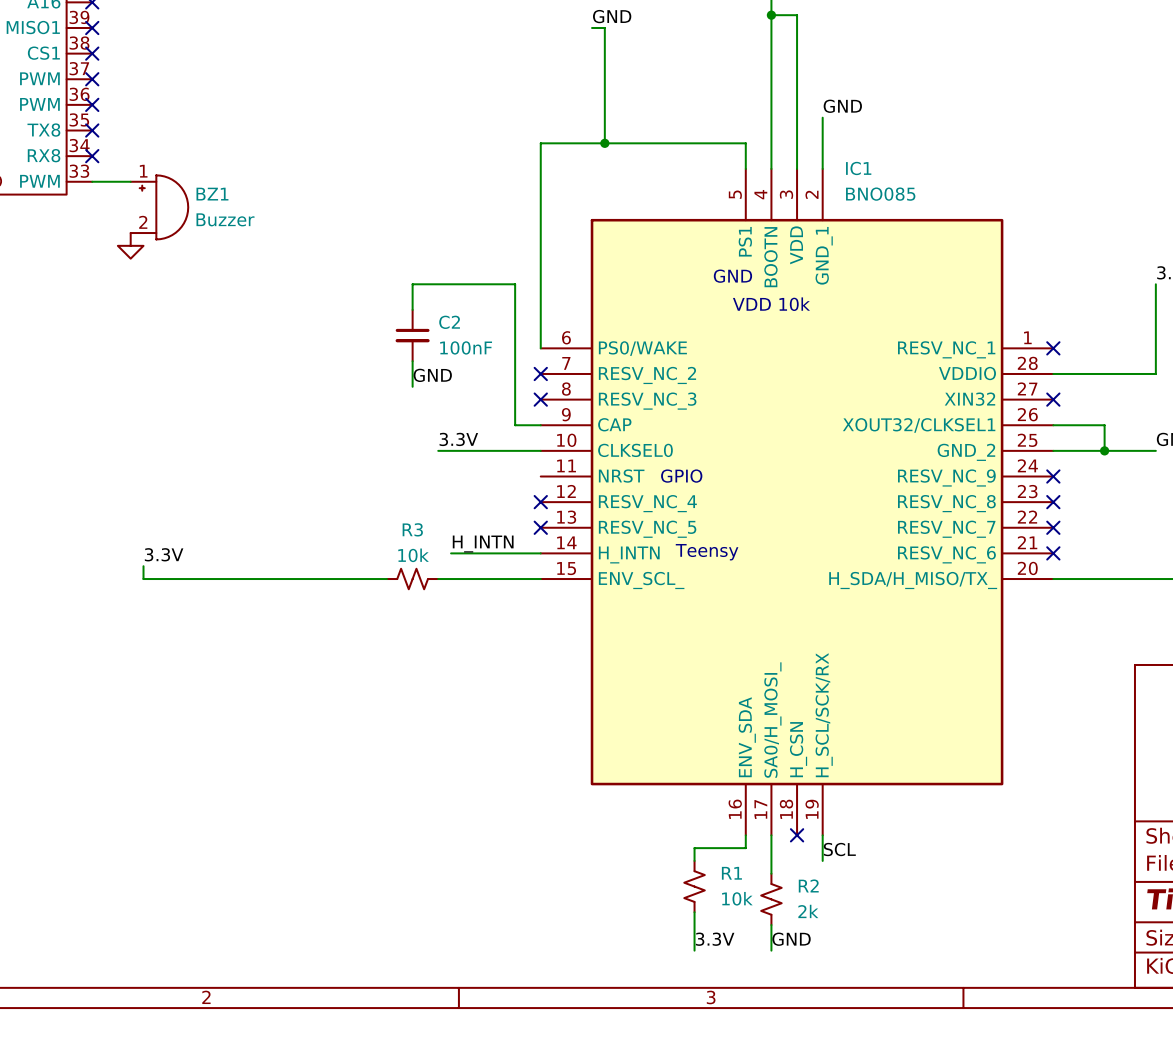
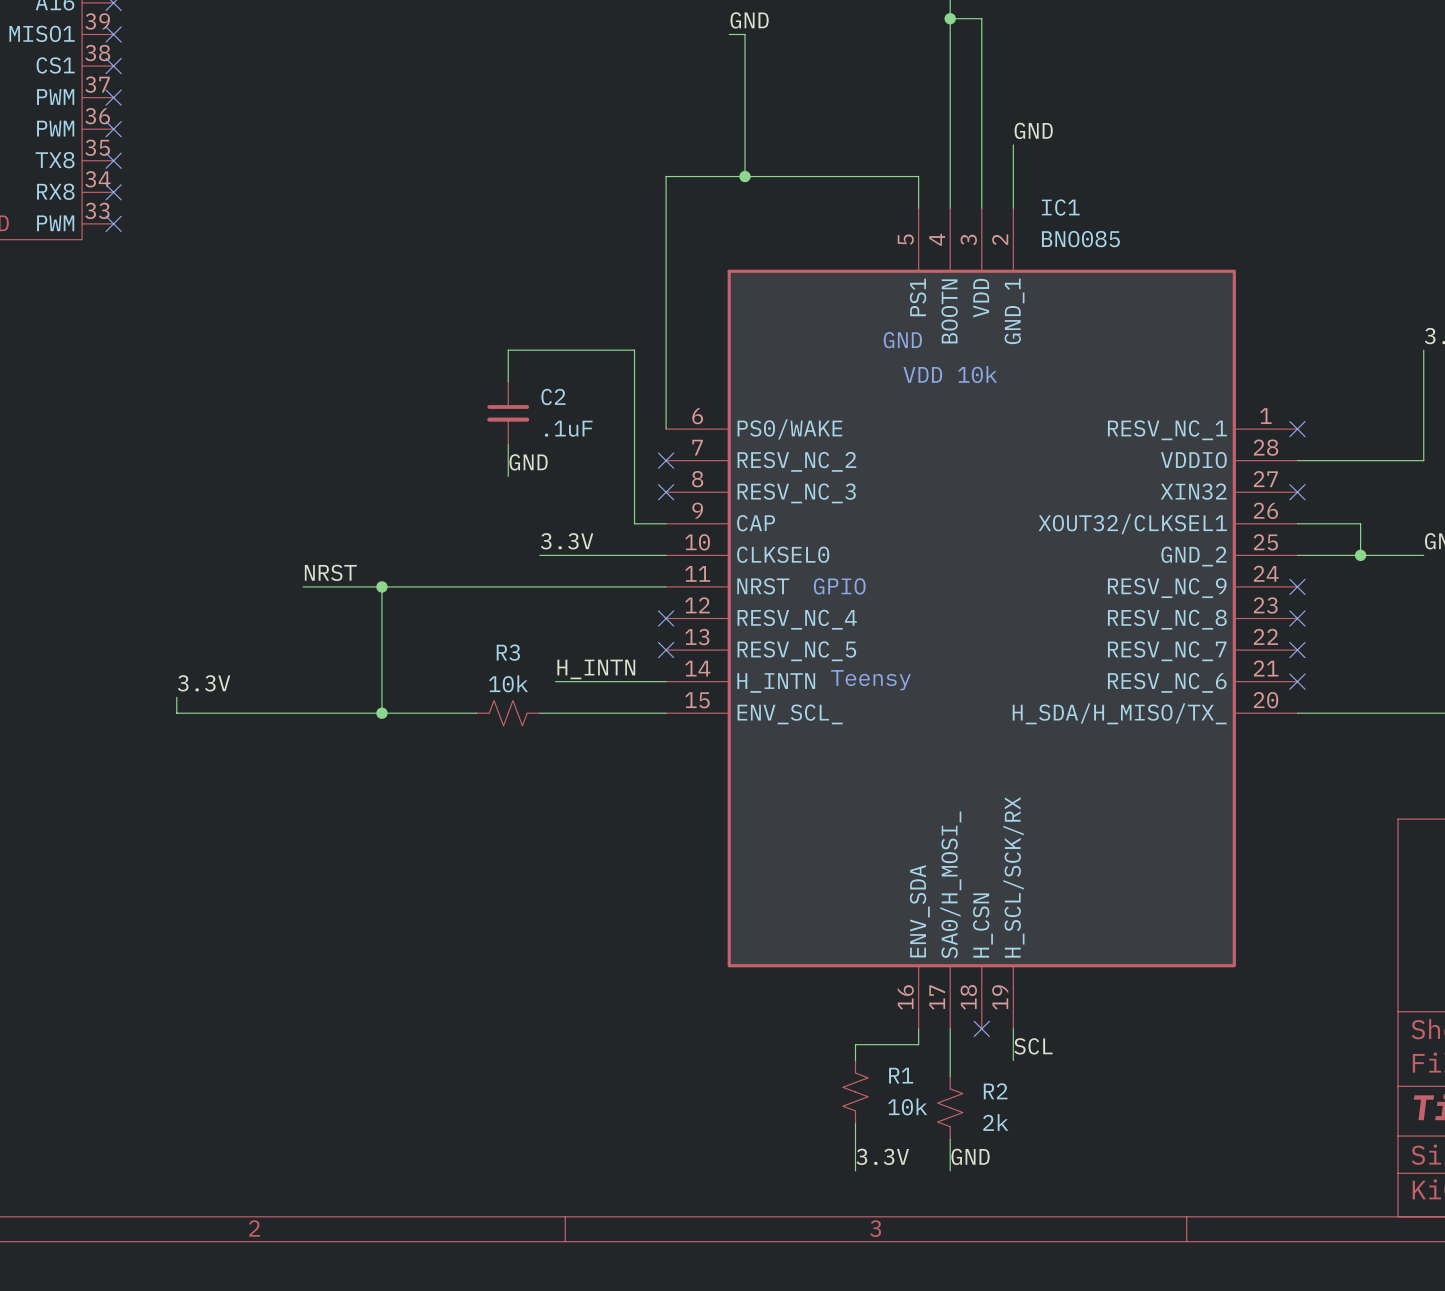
wire: (92, 181) (130, 181) -> none
no-connect mark: none -> (113, 223)
BZ1: Buzzer (159, 207) -> none
power symbol: (130, 245) -> none
C2 value: 100nF (466, 347) -> .1uF (568, 428)
label: none -> NRST (330, 572)
wire: none -> (303, 586) (666, 586)
wire: none -> (381, 586) (381, 713)
junction: none -> (381, 586)
junction: none -> (381, 713)

